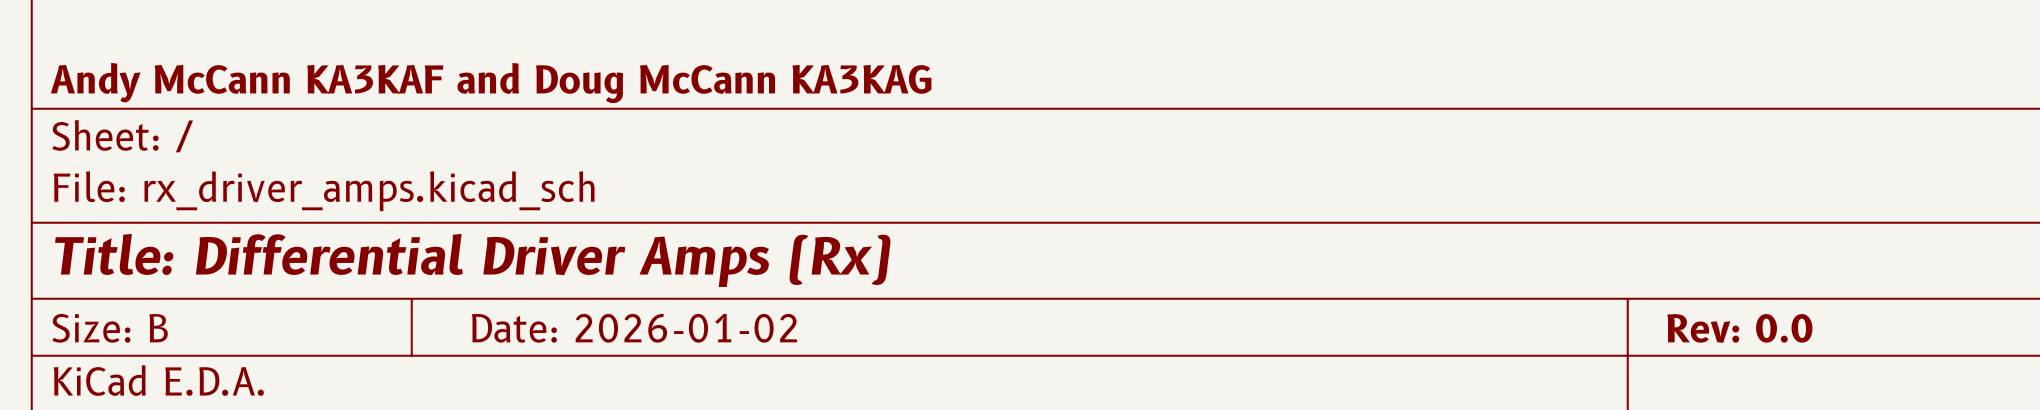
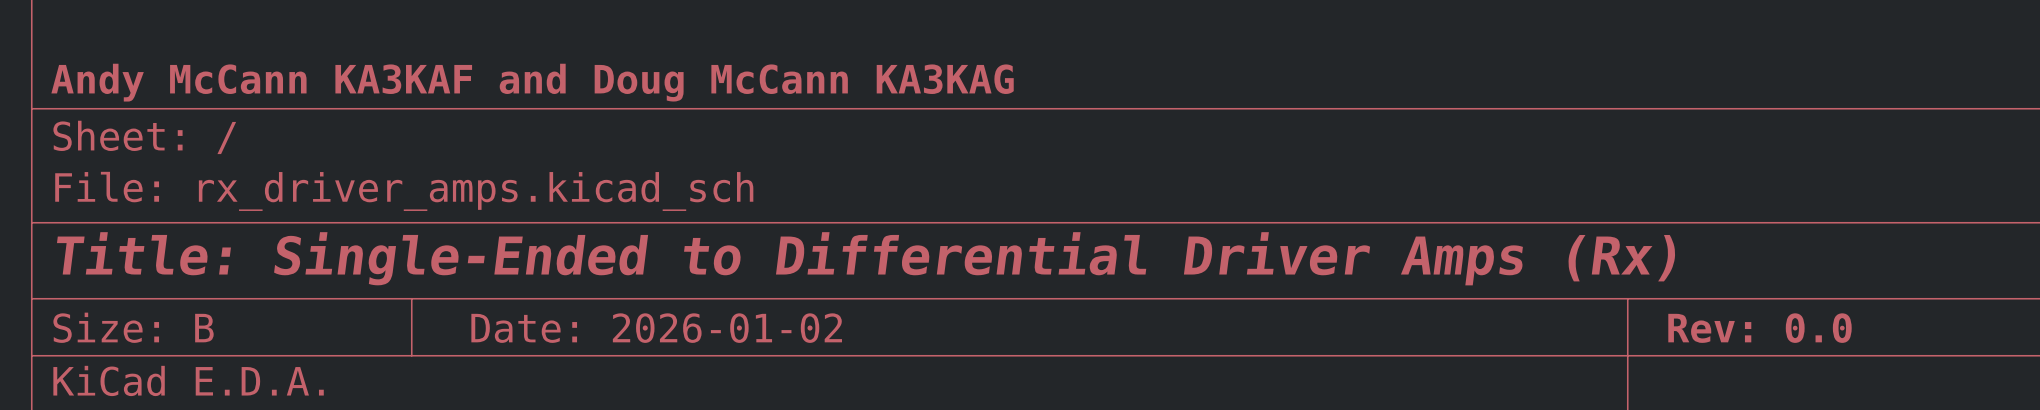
title block: Title: Differential Driver Amps (Rx) (472, 260) -> Title: Single-Ended to Differential Driver Amps (Rx) (866, 258)

